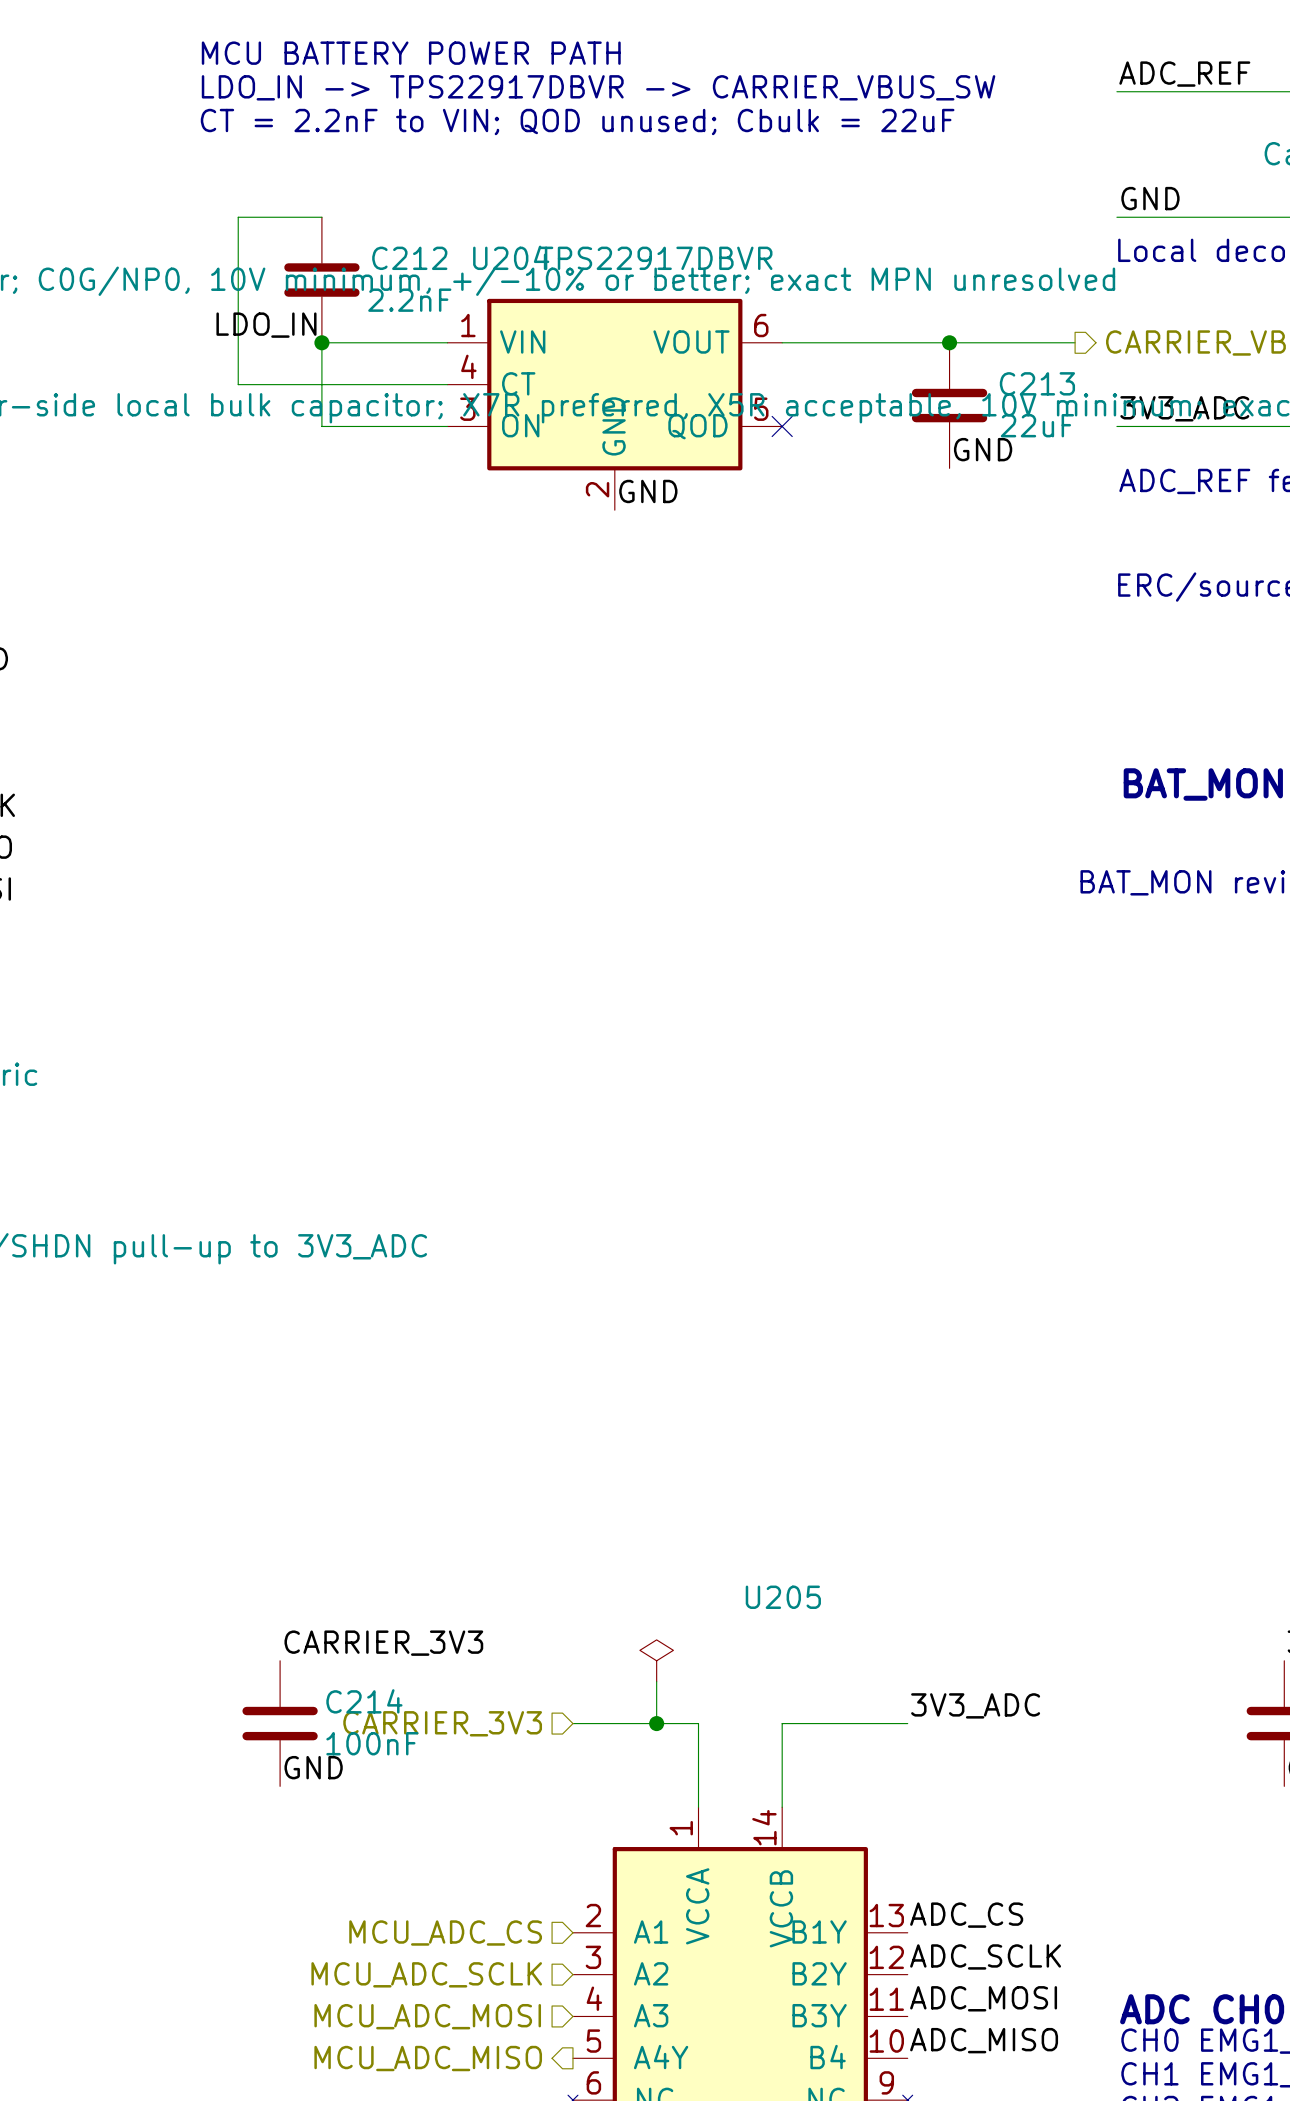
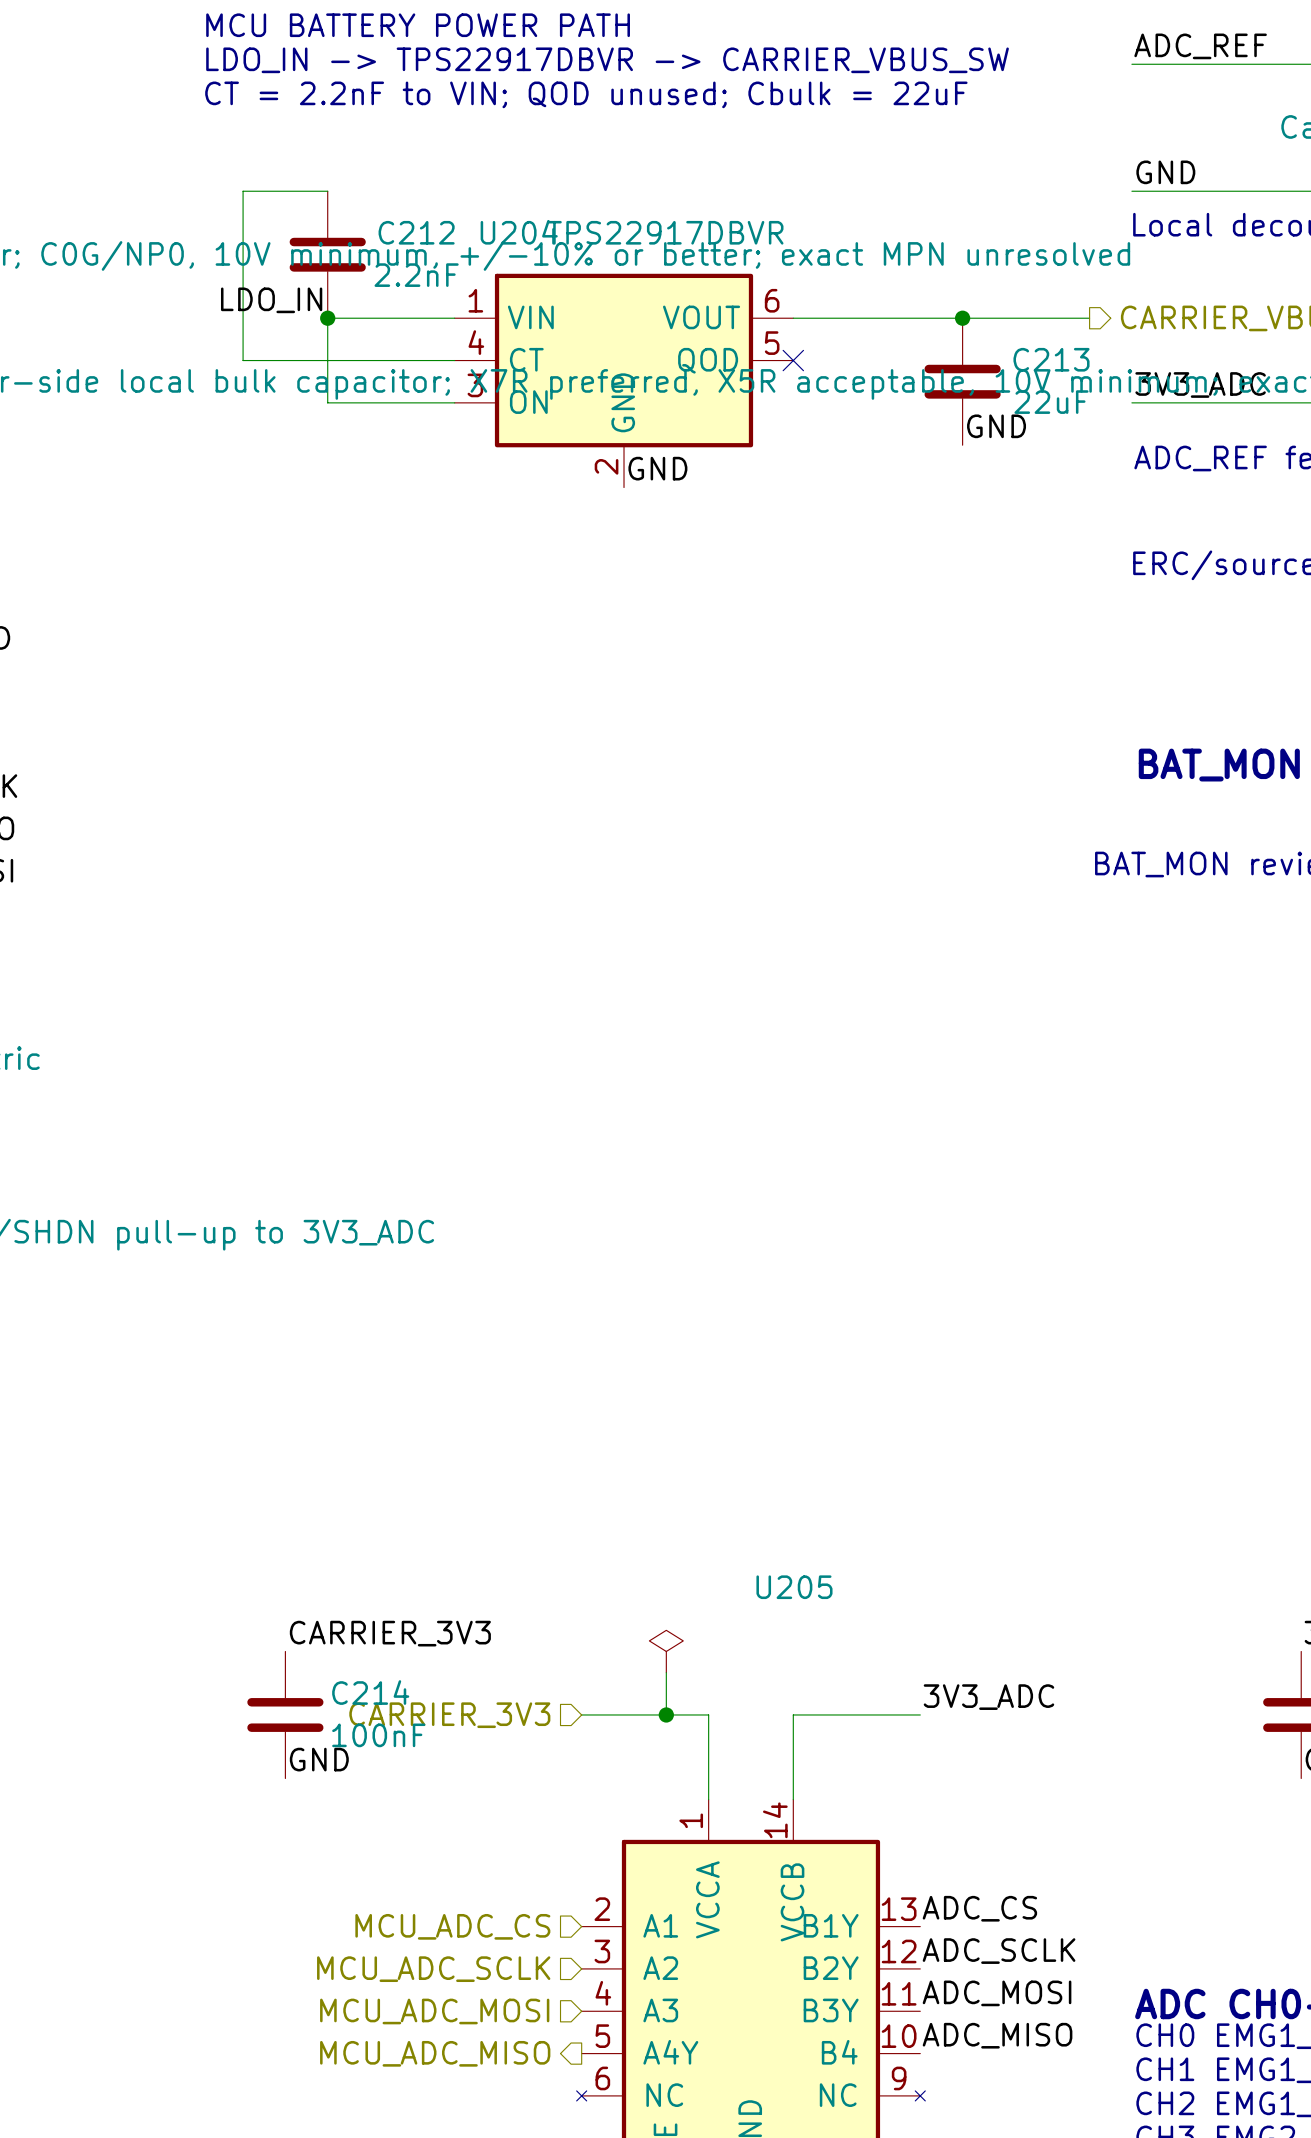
U204 symbol: [447, 298, 783, 511] -> [454, 273, 794, 488]
no-connect mark position: (782, 426) -> (793, 360)

